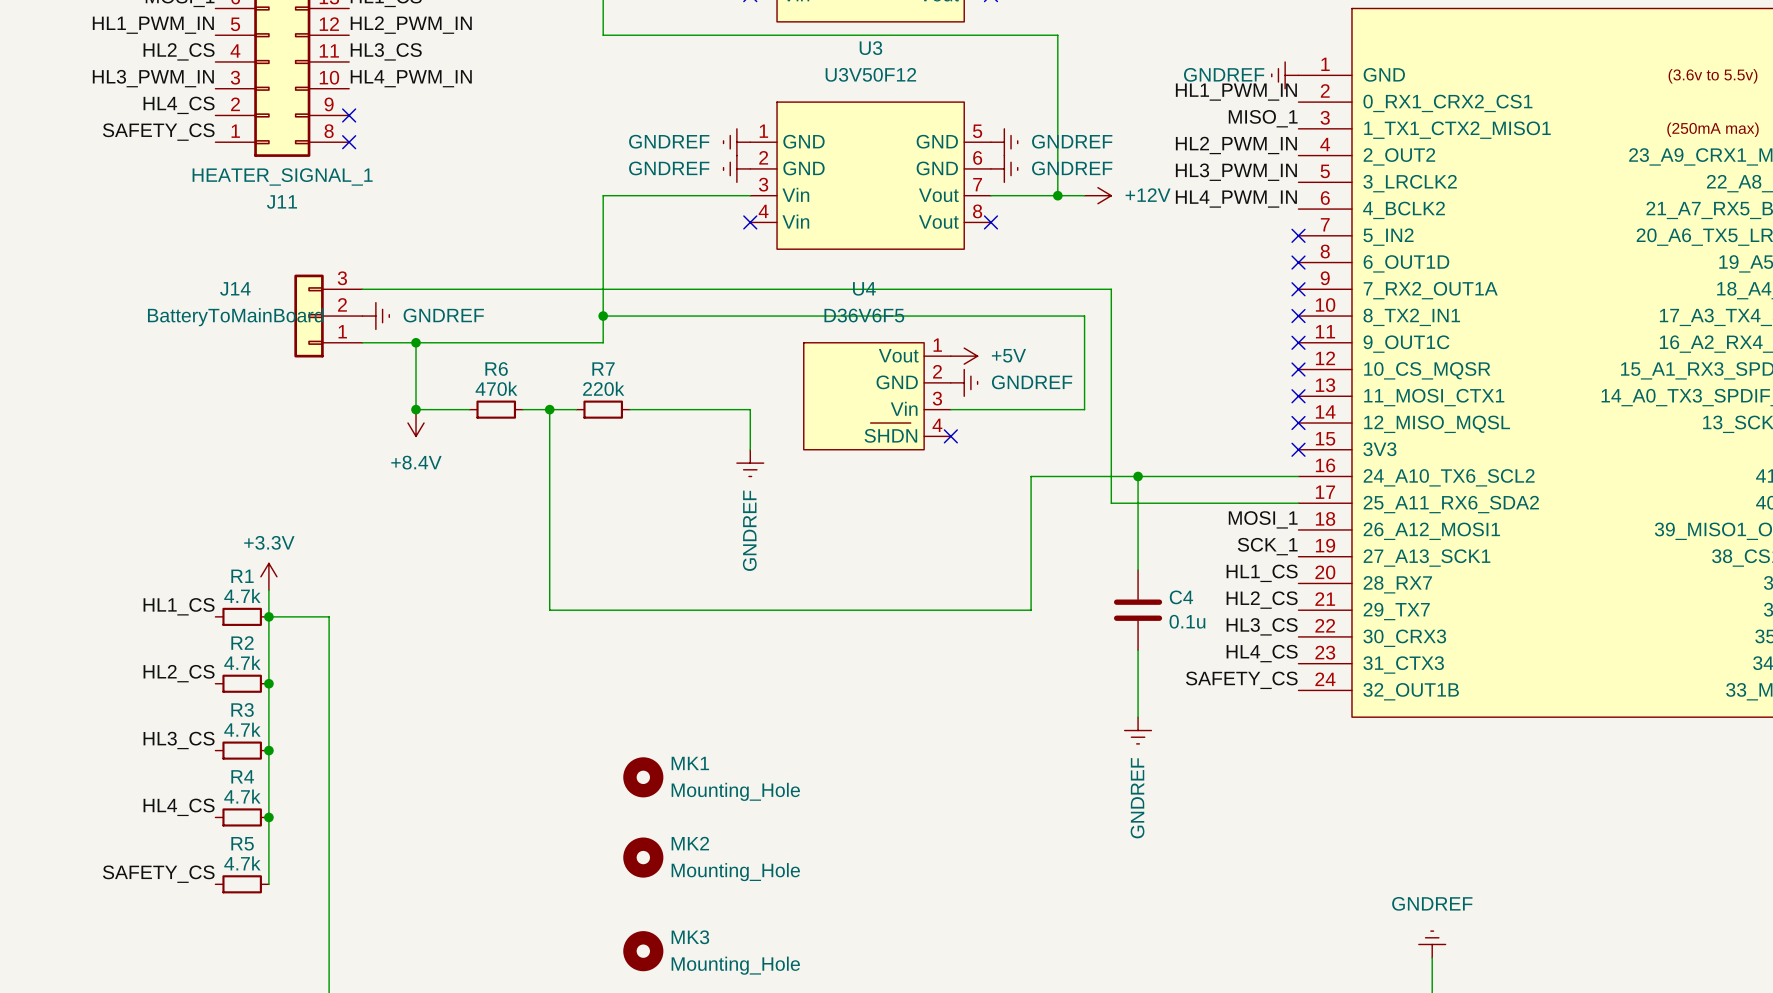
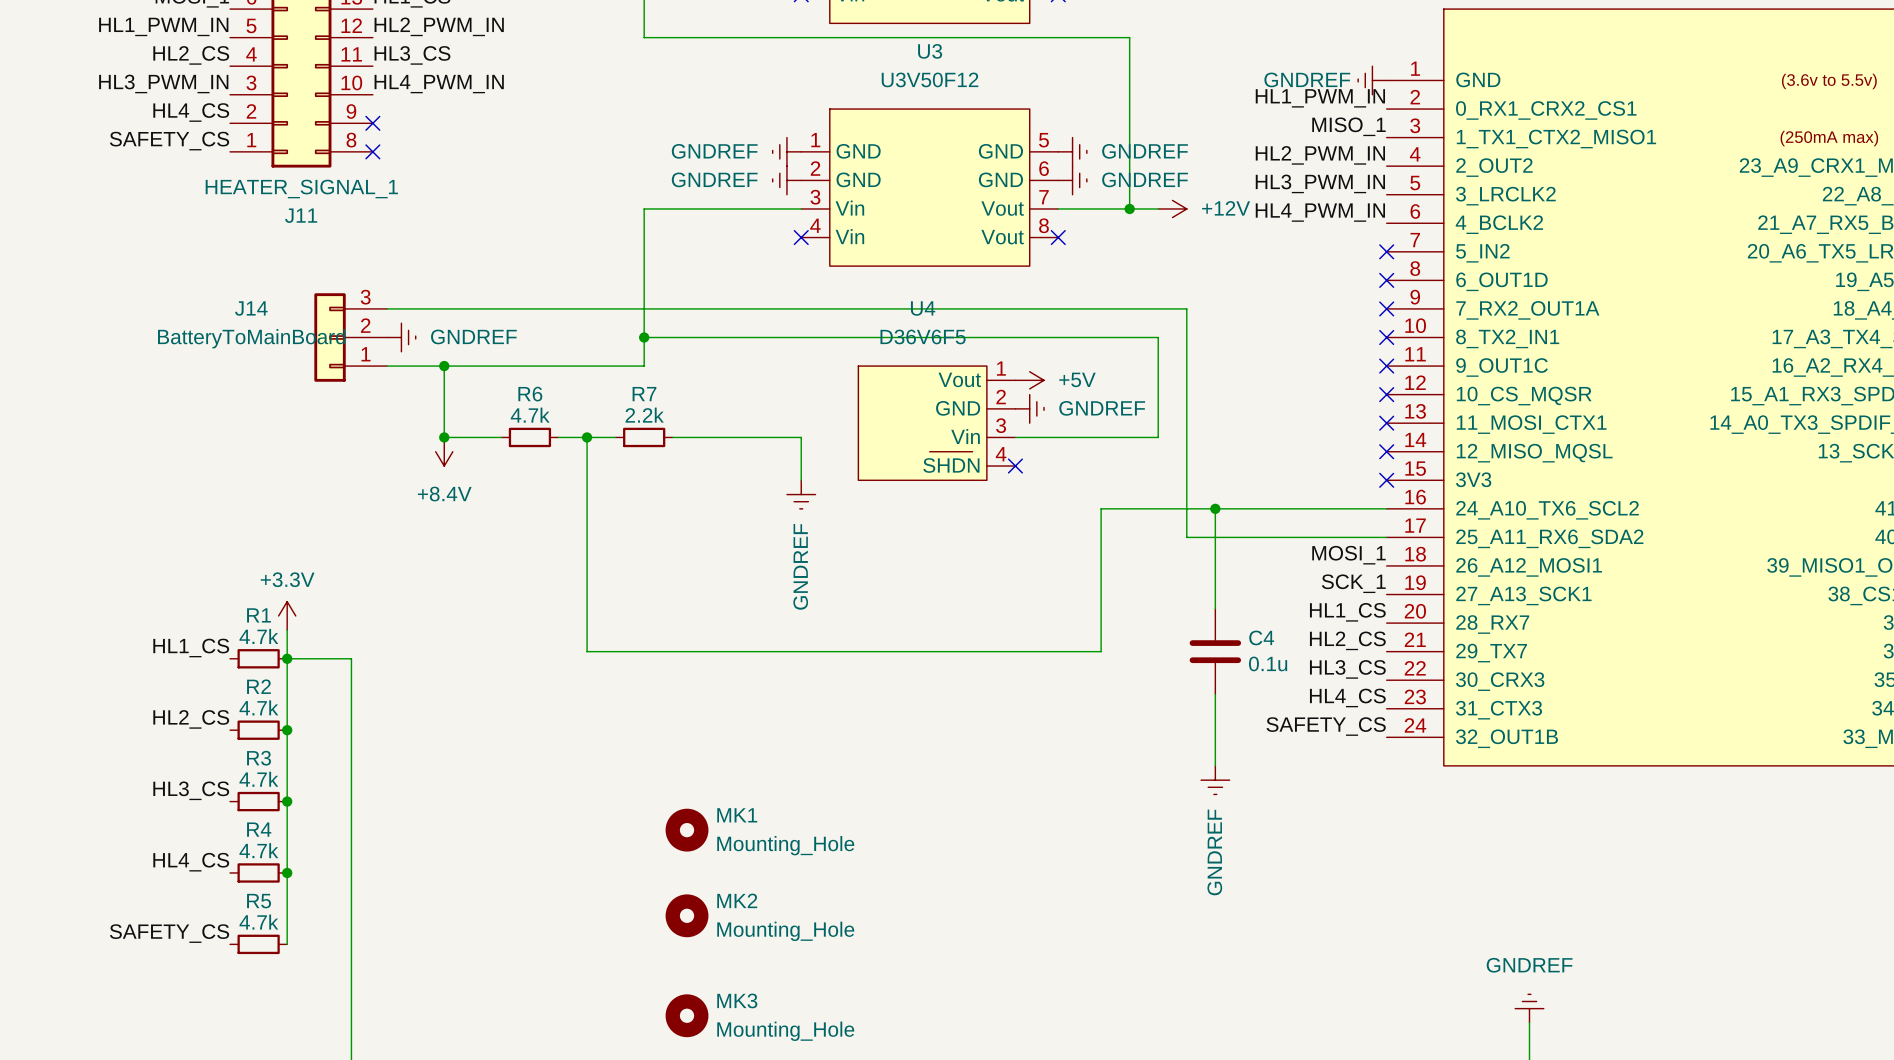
R6 value: 470k (496, 388) -> 4.7k (530, 415)
R7 value: 220k (603, 388) -> 2.2k (644, 415)

